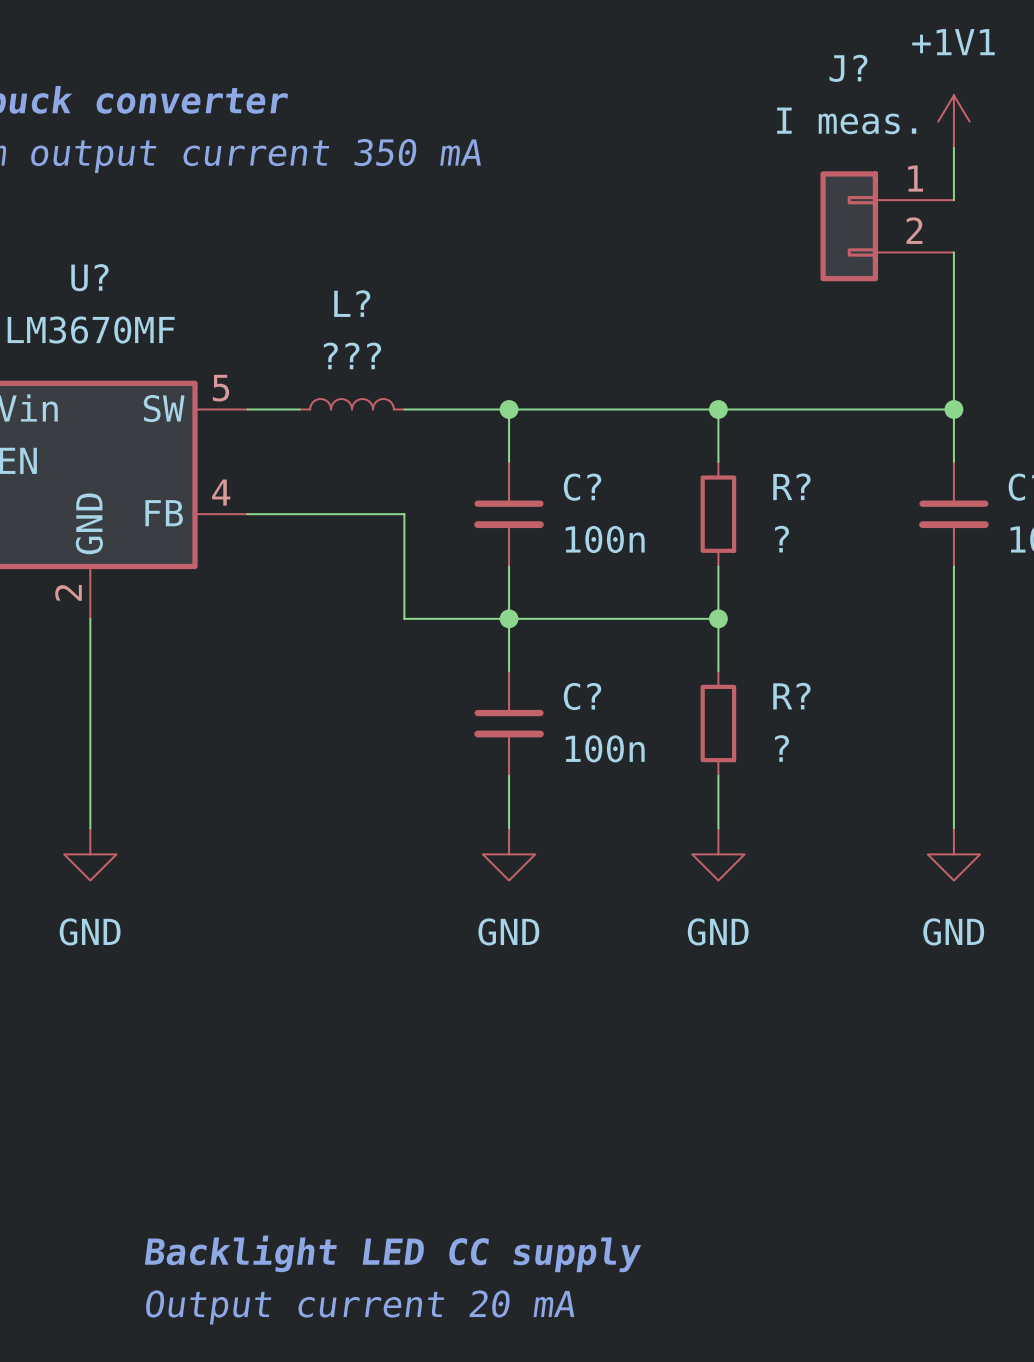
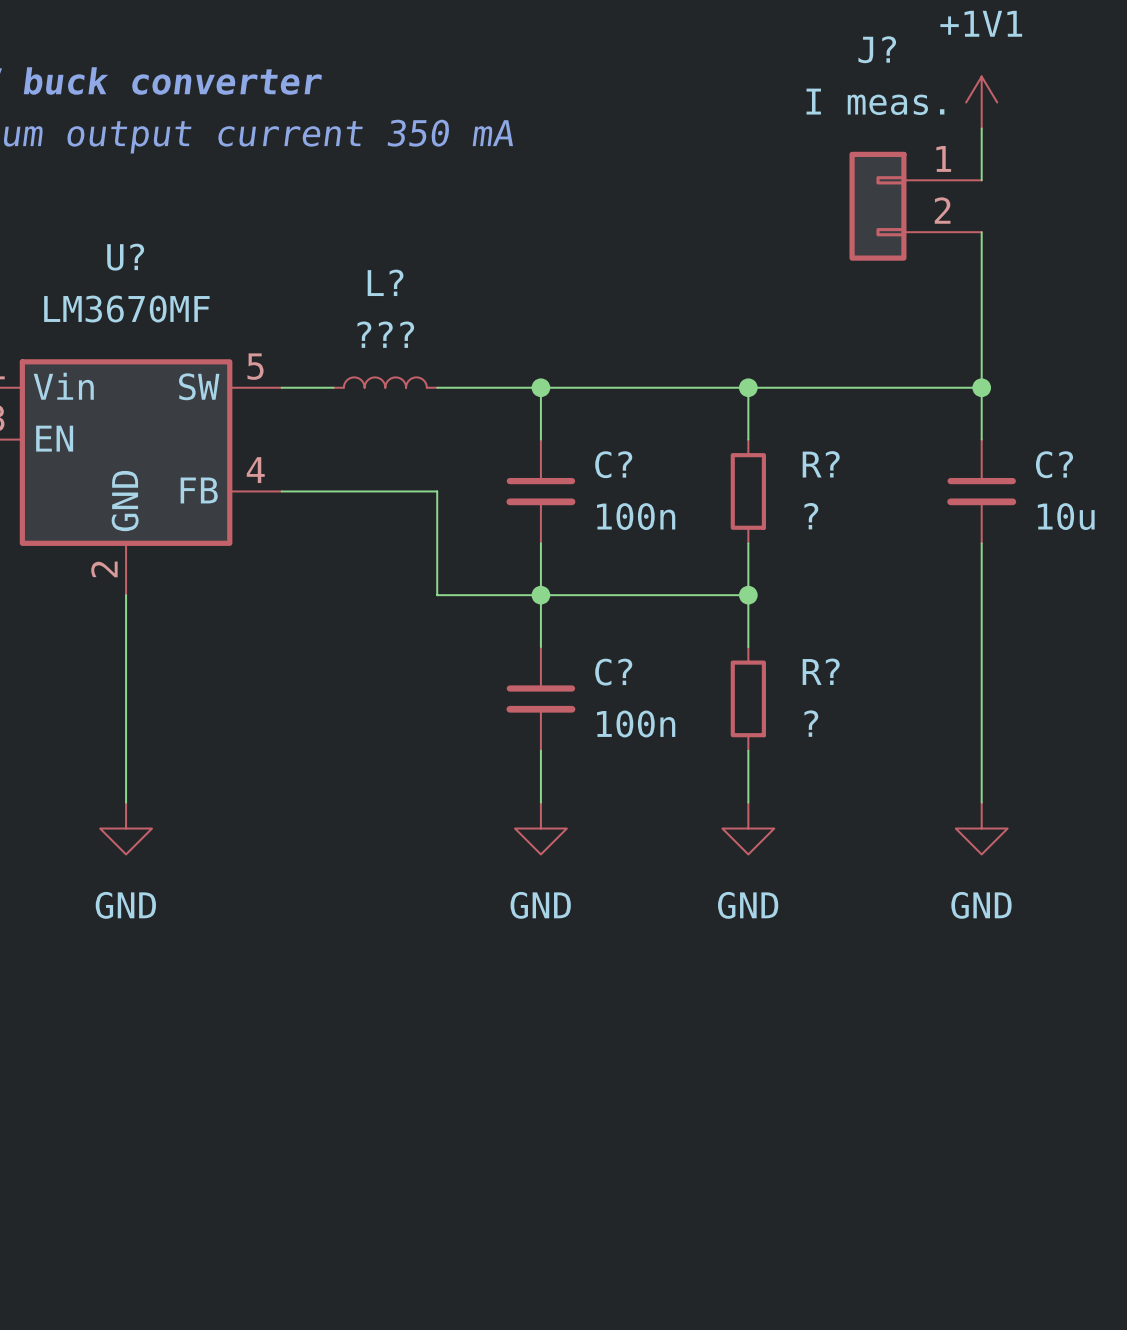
text: Backlight LED CC supply (393, 1253) -> none
text: Output current 20 mA (359, 1307) -> none

